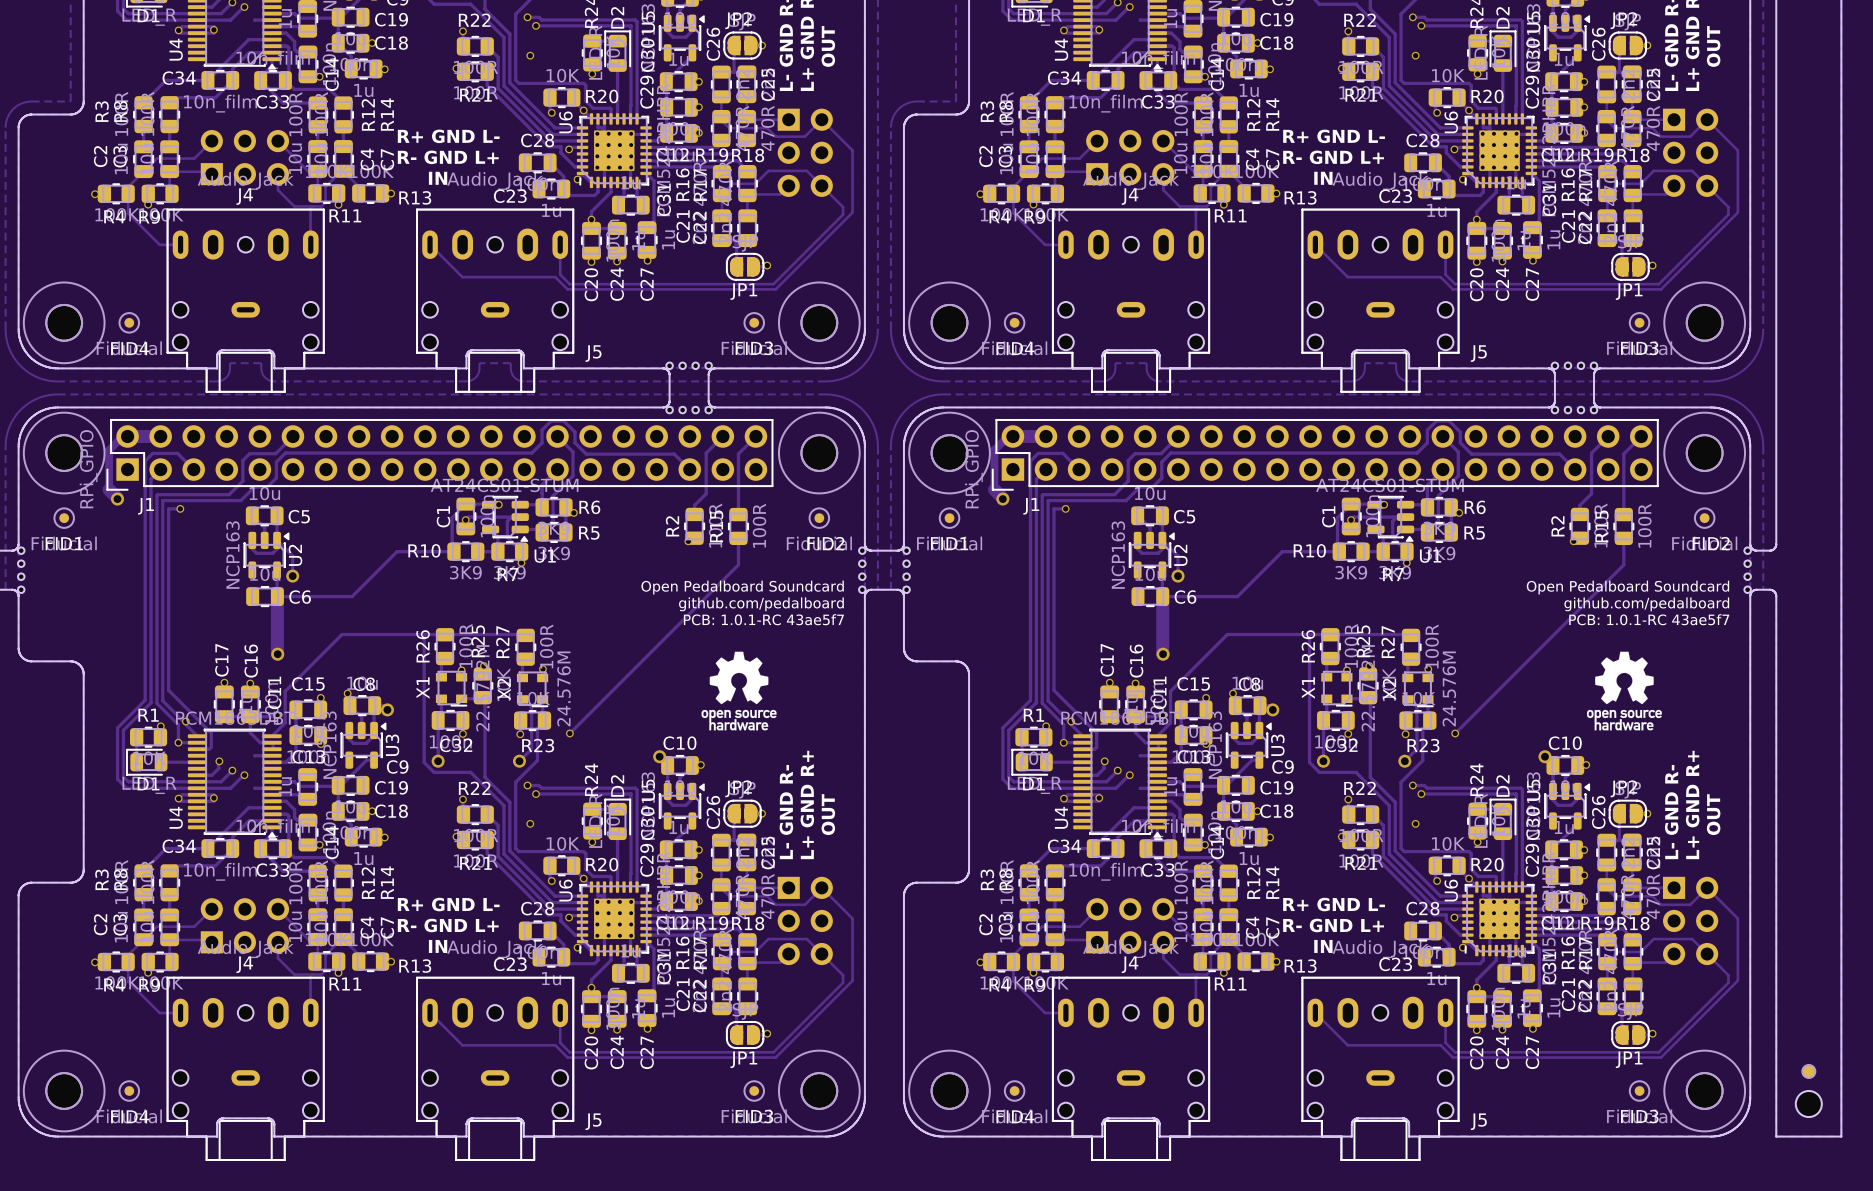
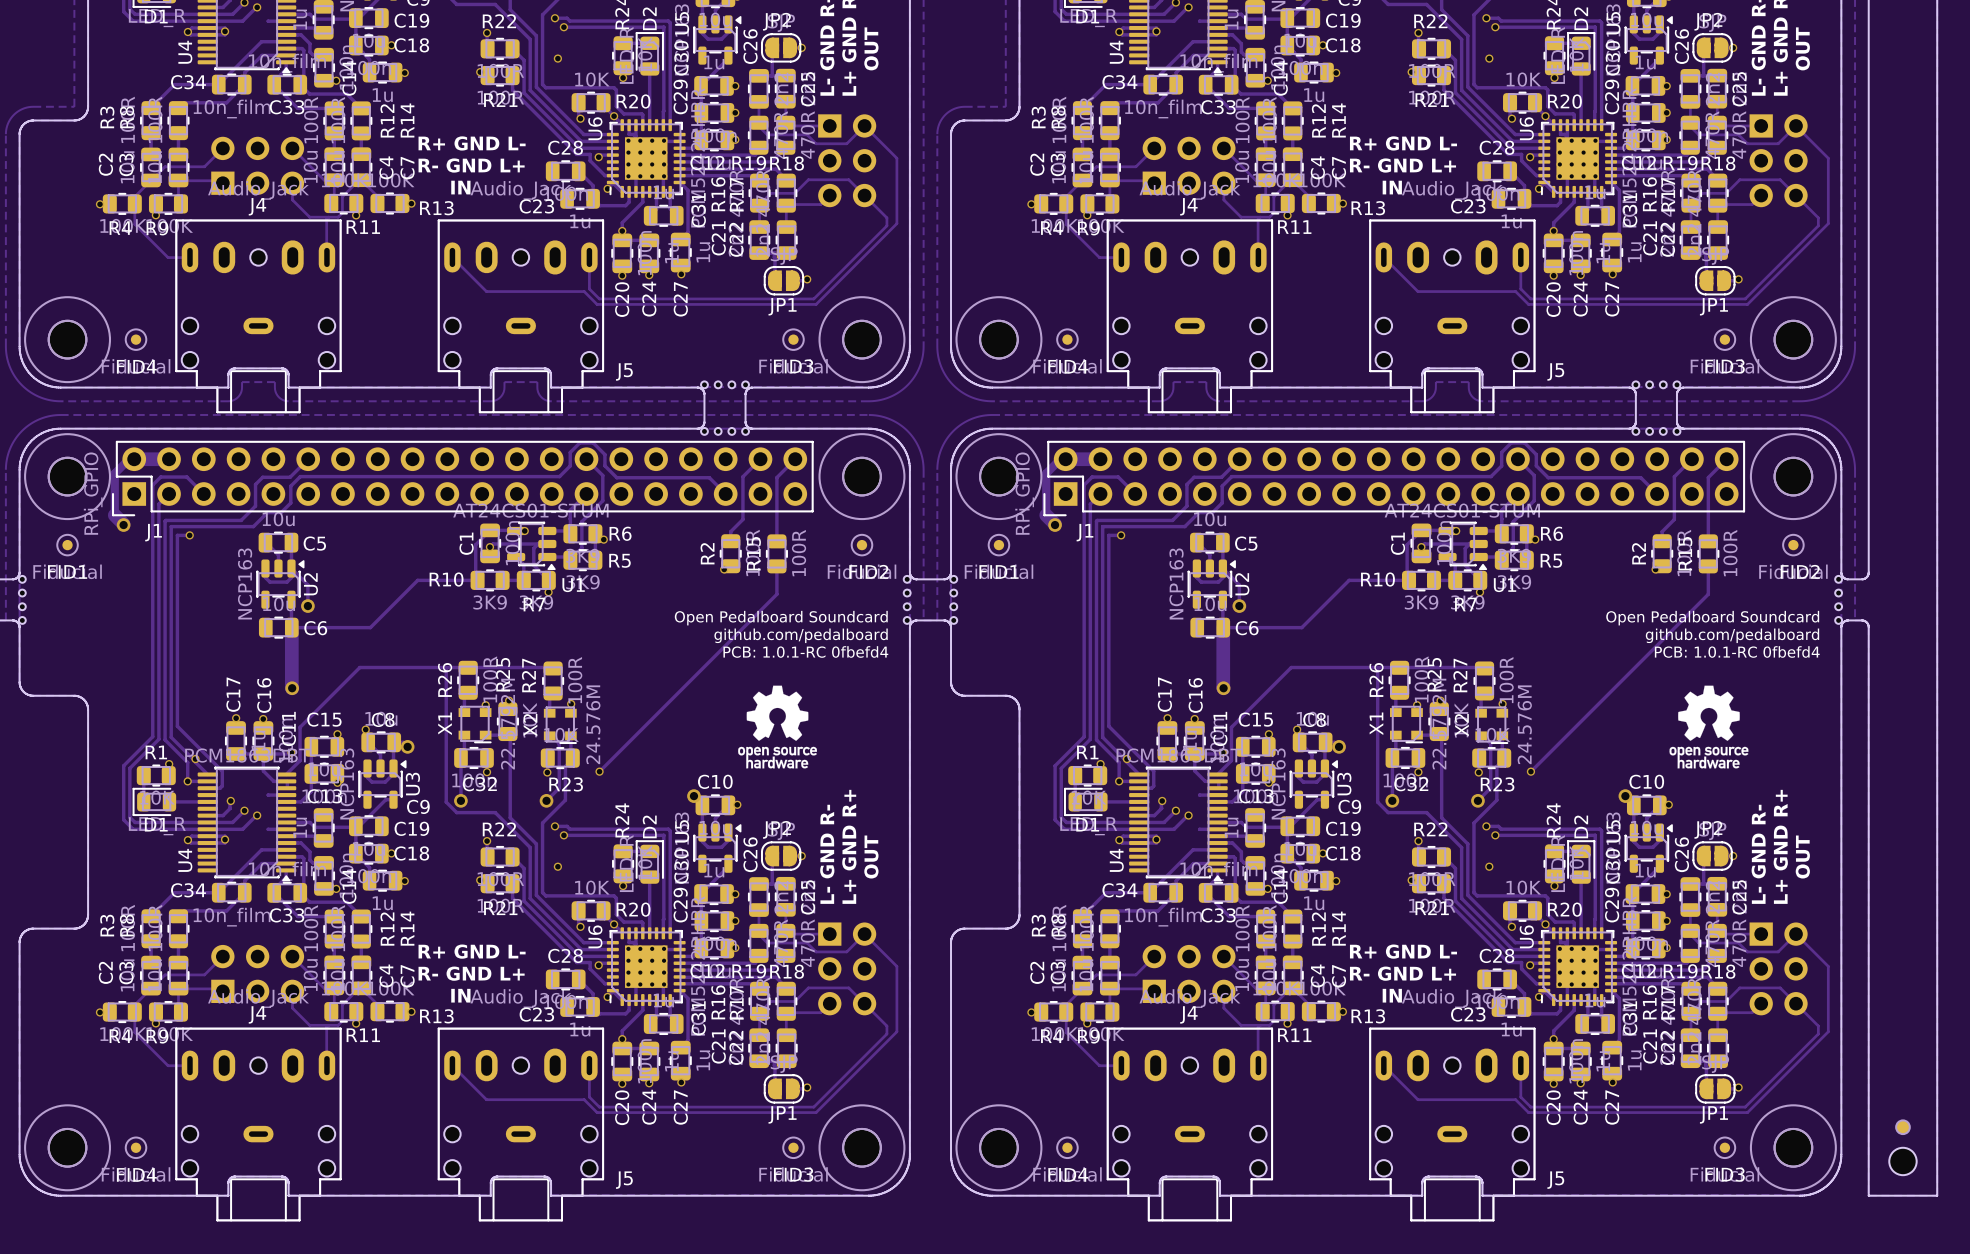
text: PCB: 1.0.1-RC 43ae5f7 (763, 619) -> PCB: 1.0.1-RC 0fbefd4 (805, 651)
text: PCB: 1.0.1-RC 43ae5f7 (1649, 619) -> PCB: 1.0.1-RC 0fbefd4 (1737, 651)

